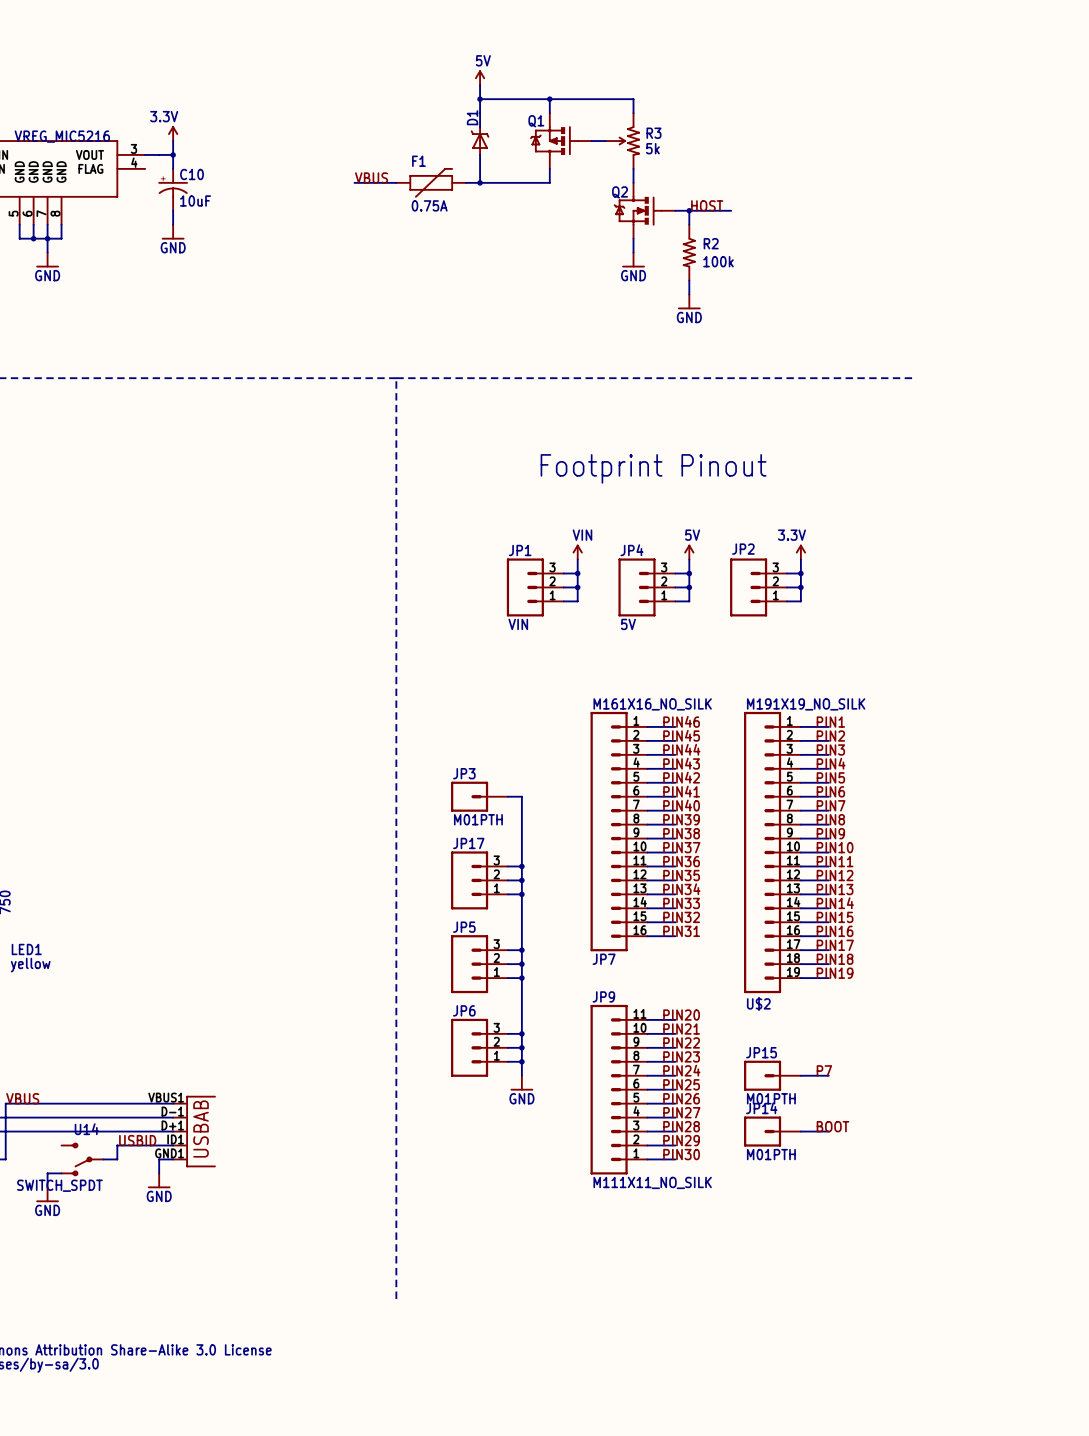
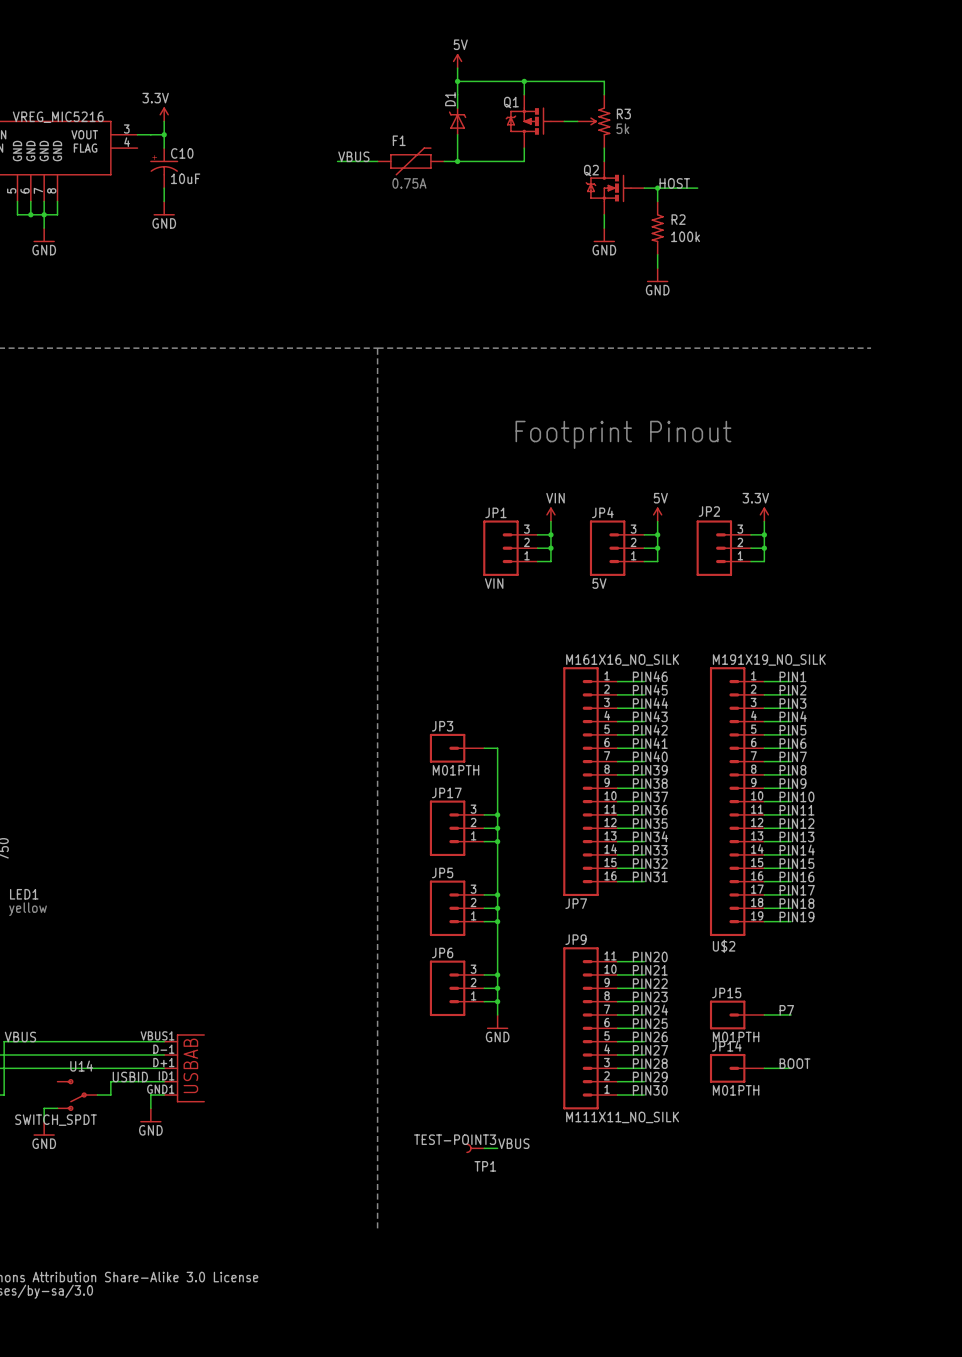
label: none -> VBUS (513, 1143)
TP1: none -> TEST-POINT3 (475, 1148)
wire: none -> (484, 1148) (497, 1148)

